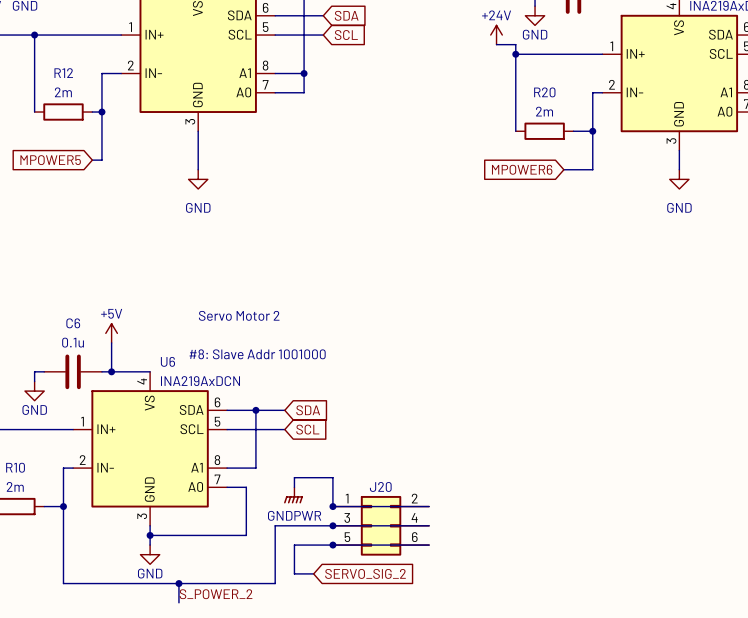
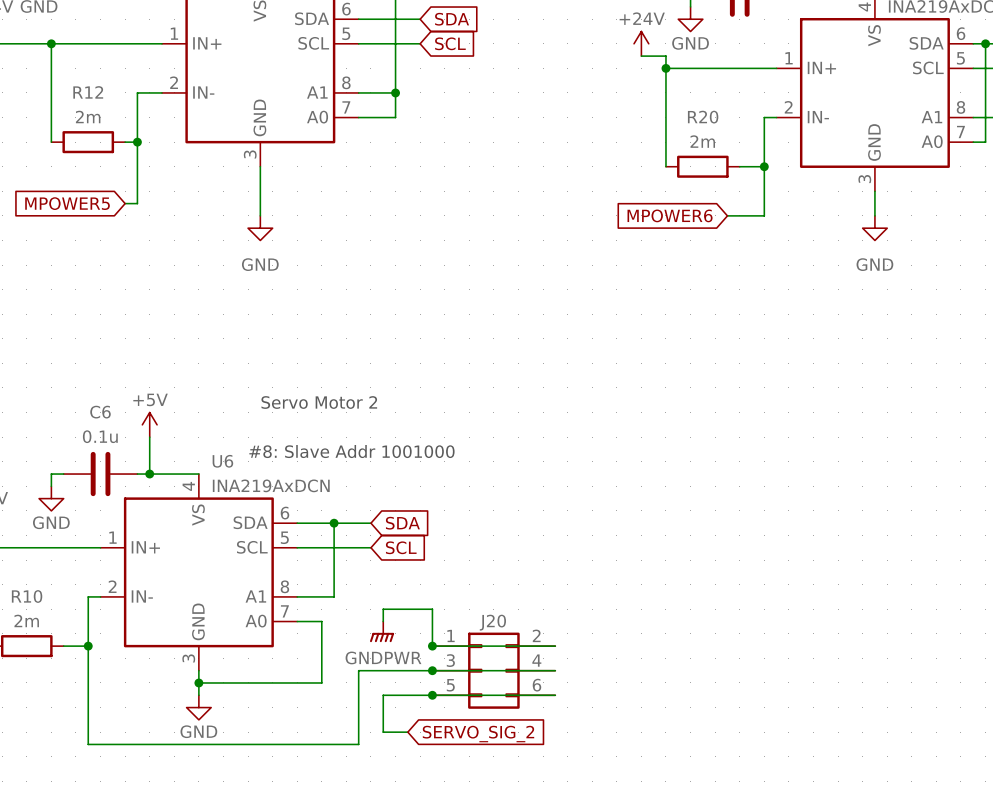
wire: (178, 583) (178, 602) -> none
junction: (178, 583) -> none
label: S_POWER_2 (216, 594) -> none

